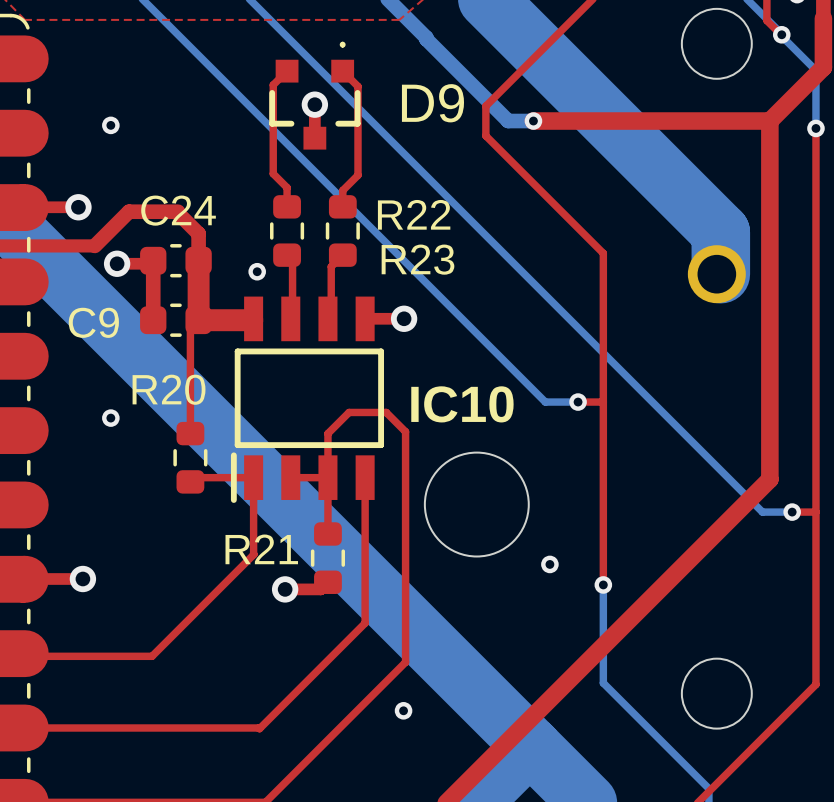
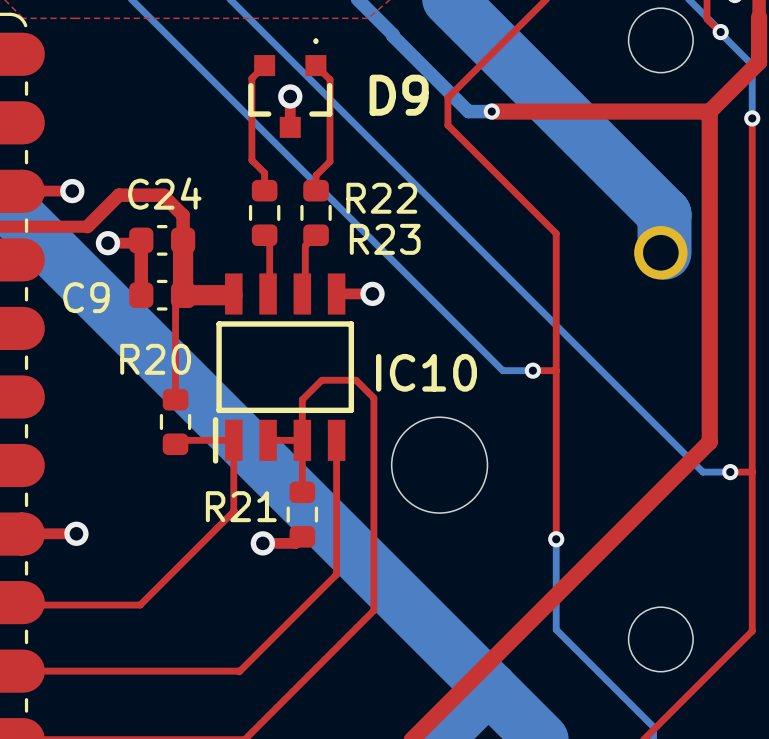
via: (110, 125) -> none
via: (257, 271) -> none
via: (110, 418) -> none
via: (549, 564) -> none
via: (403, 710) -> none

